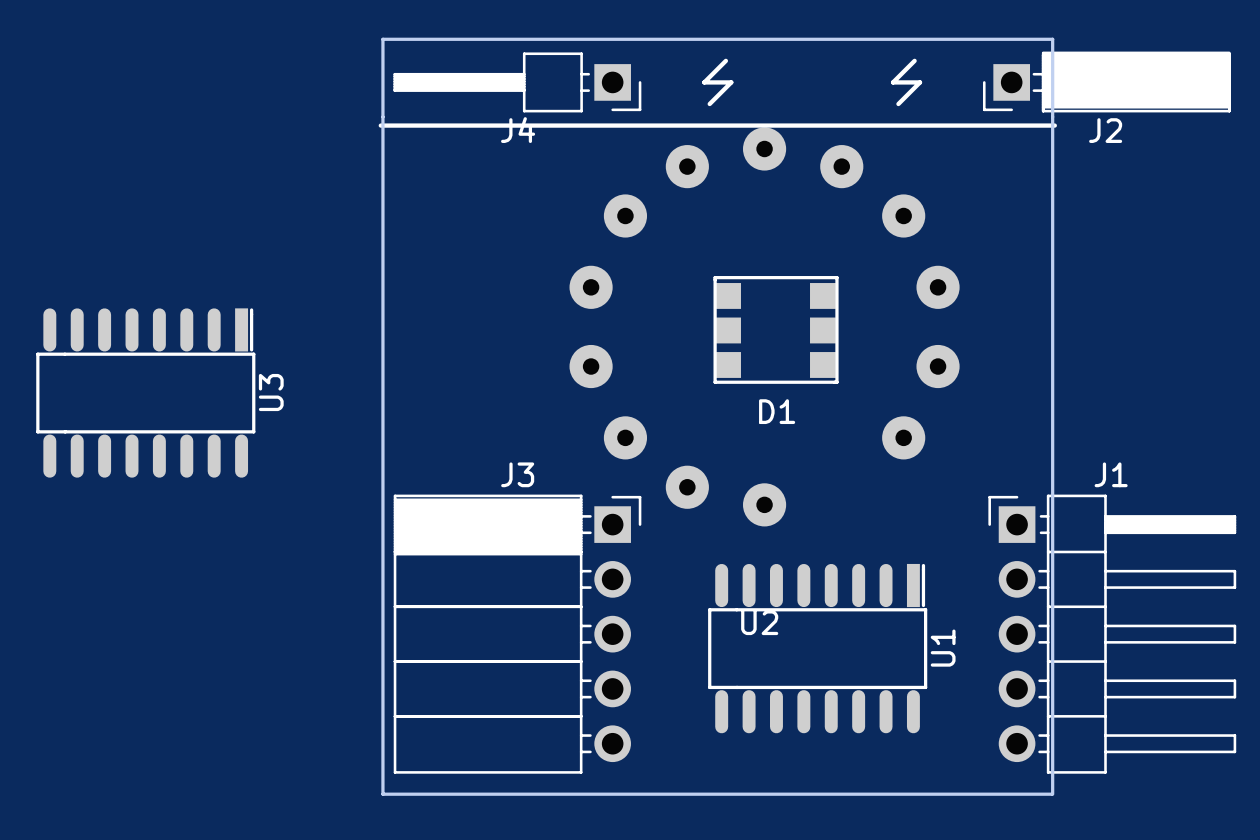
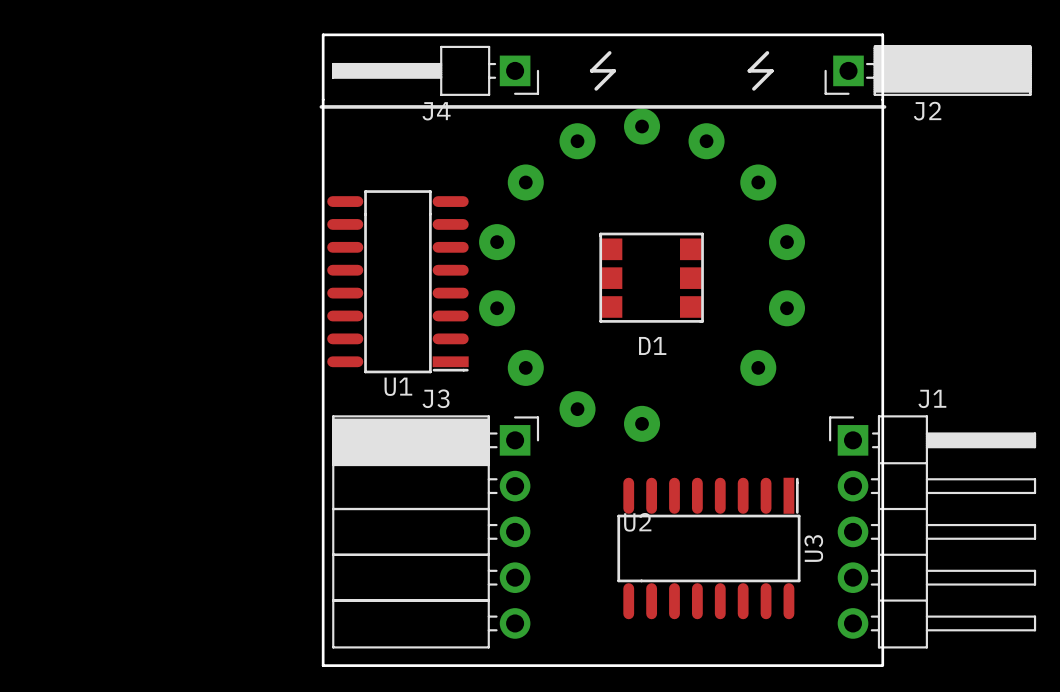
U3 position: (145, 393) -> (708, 548)
U1 rotation: 0° (817, 648) -> 90° clockwise (397, 281)
U1 position: (817, 648) -> (397, 281)

